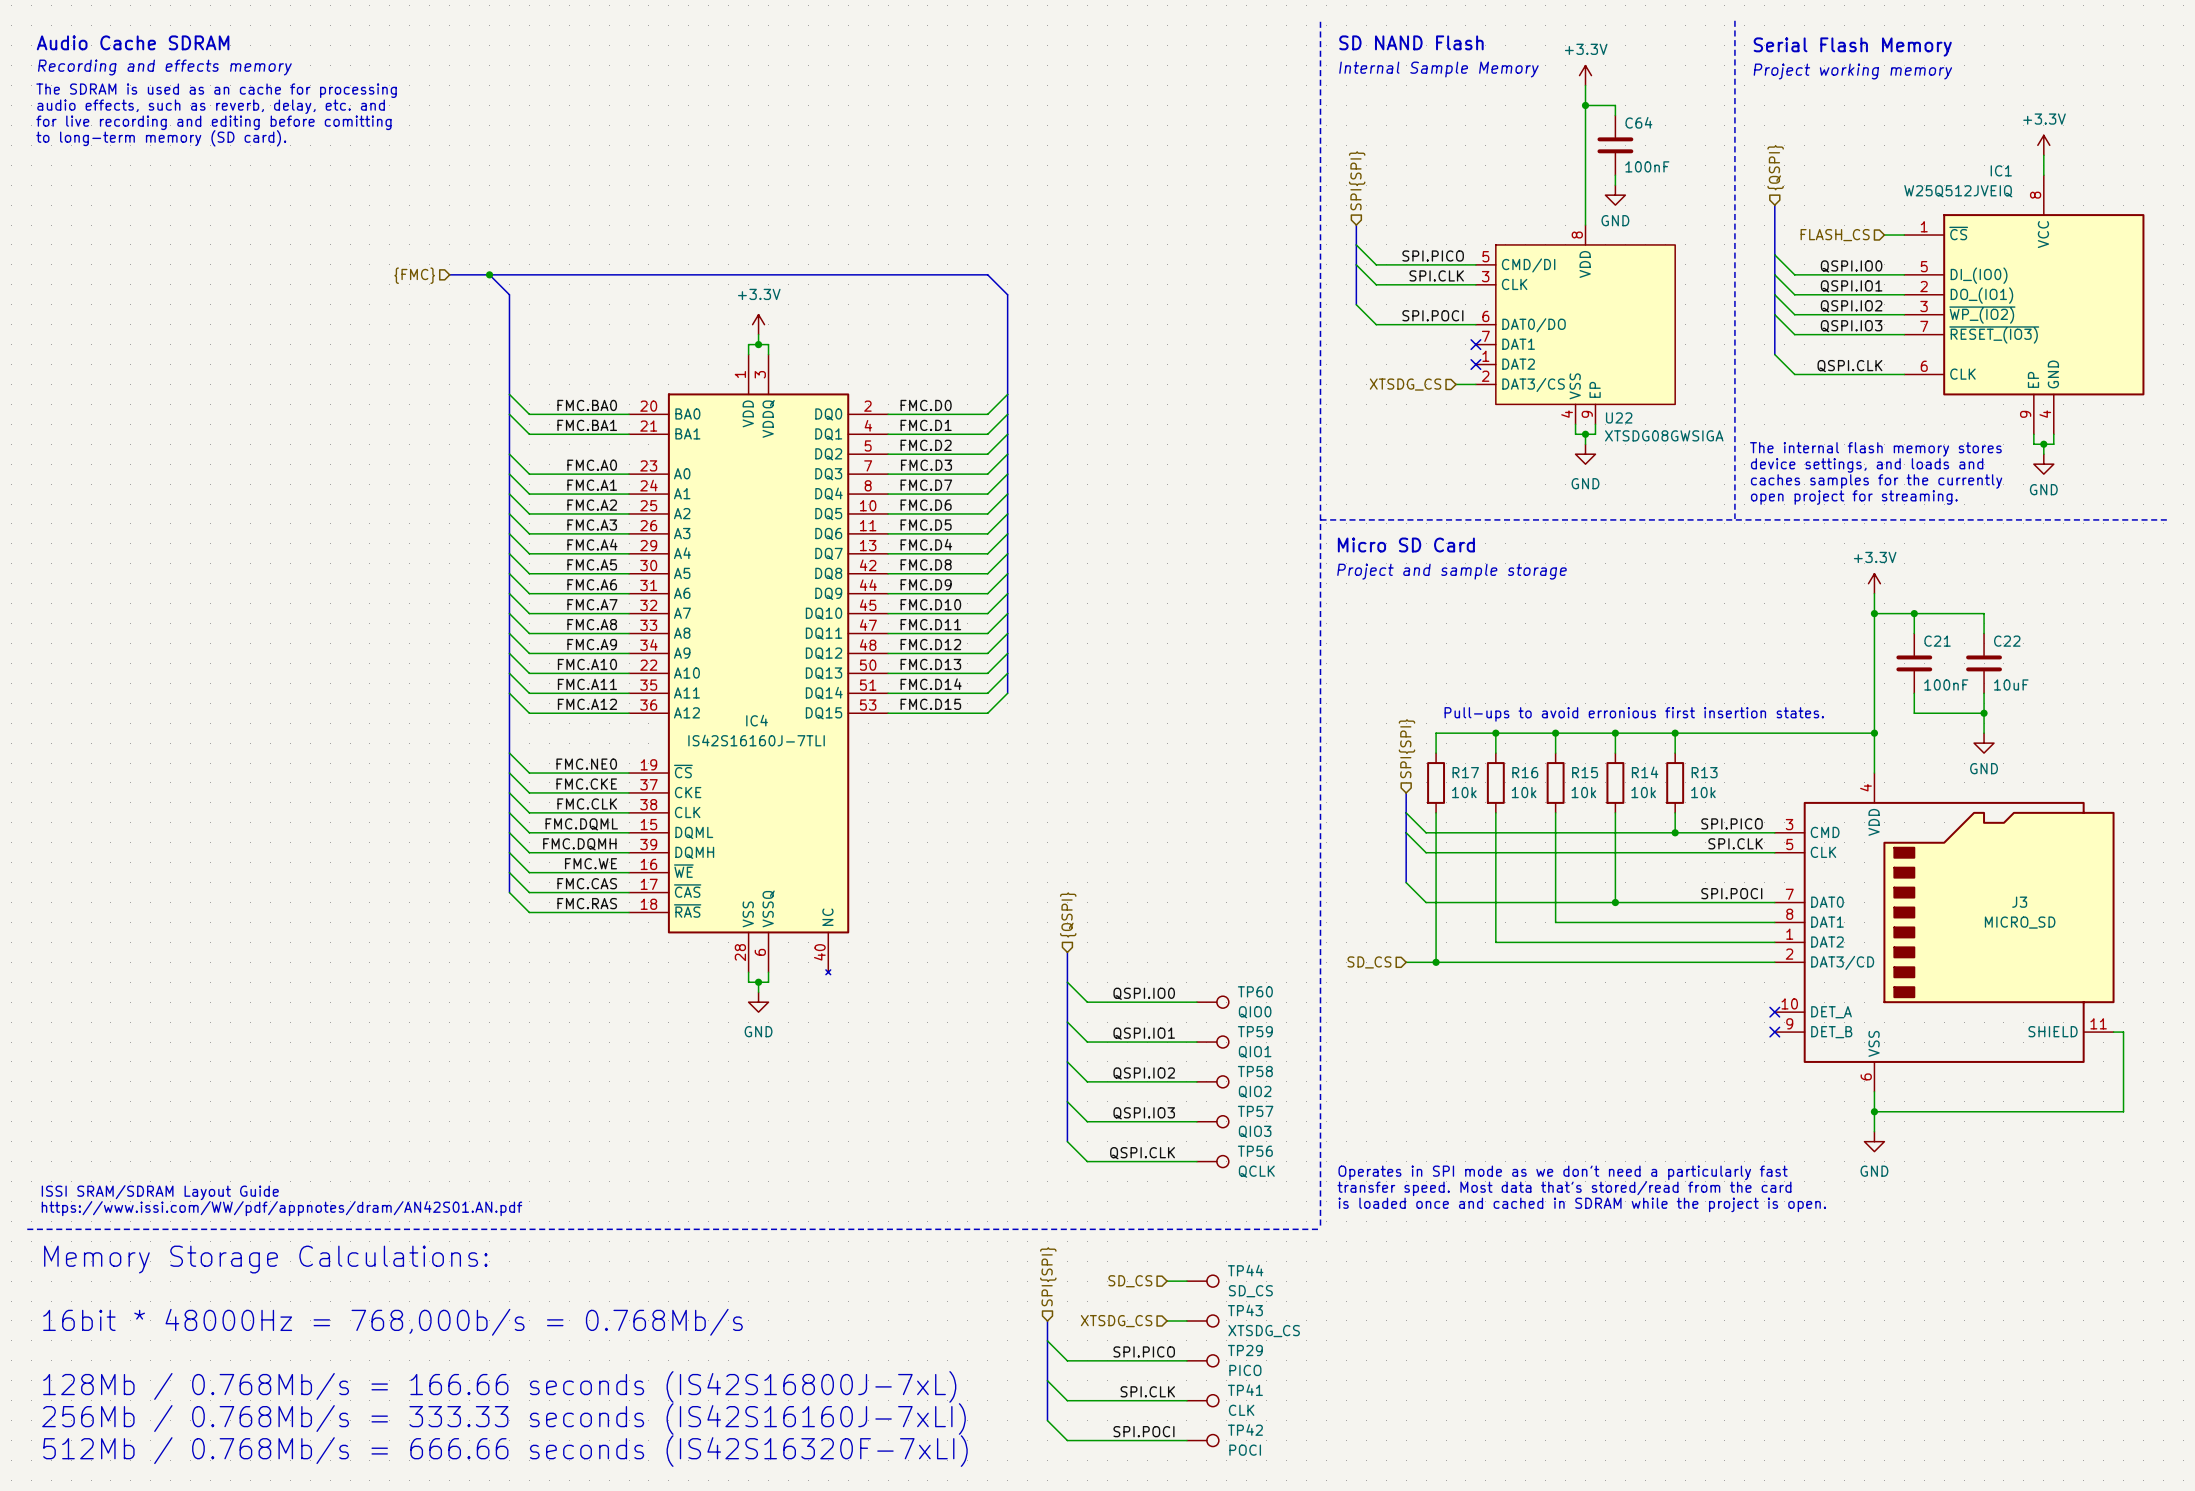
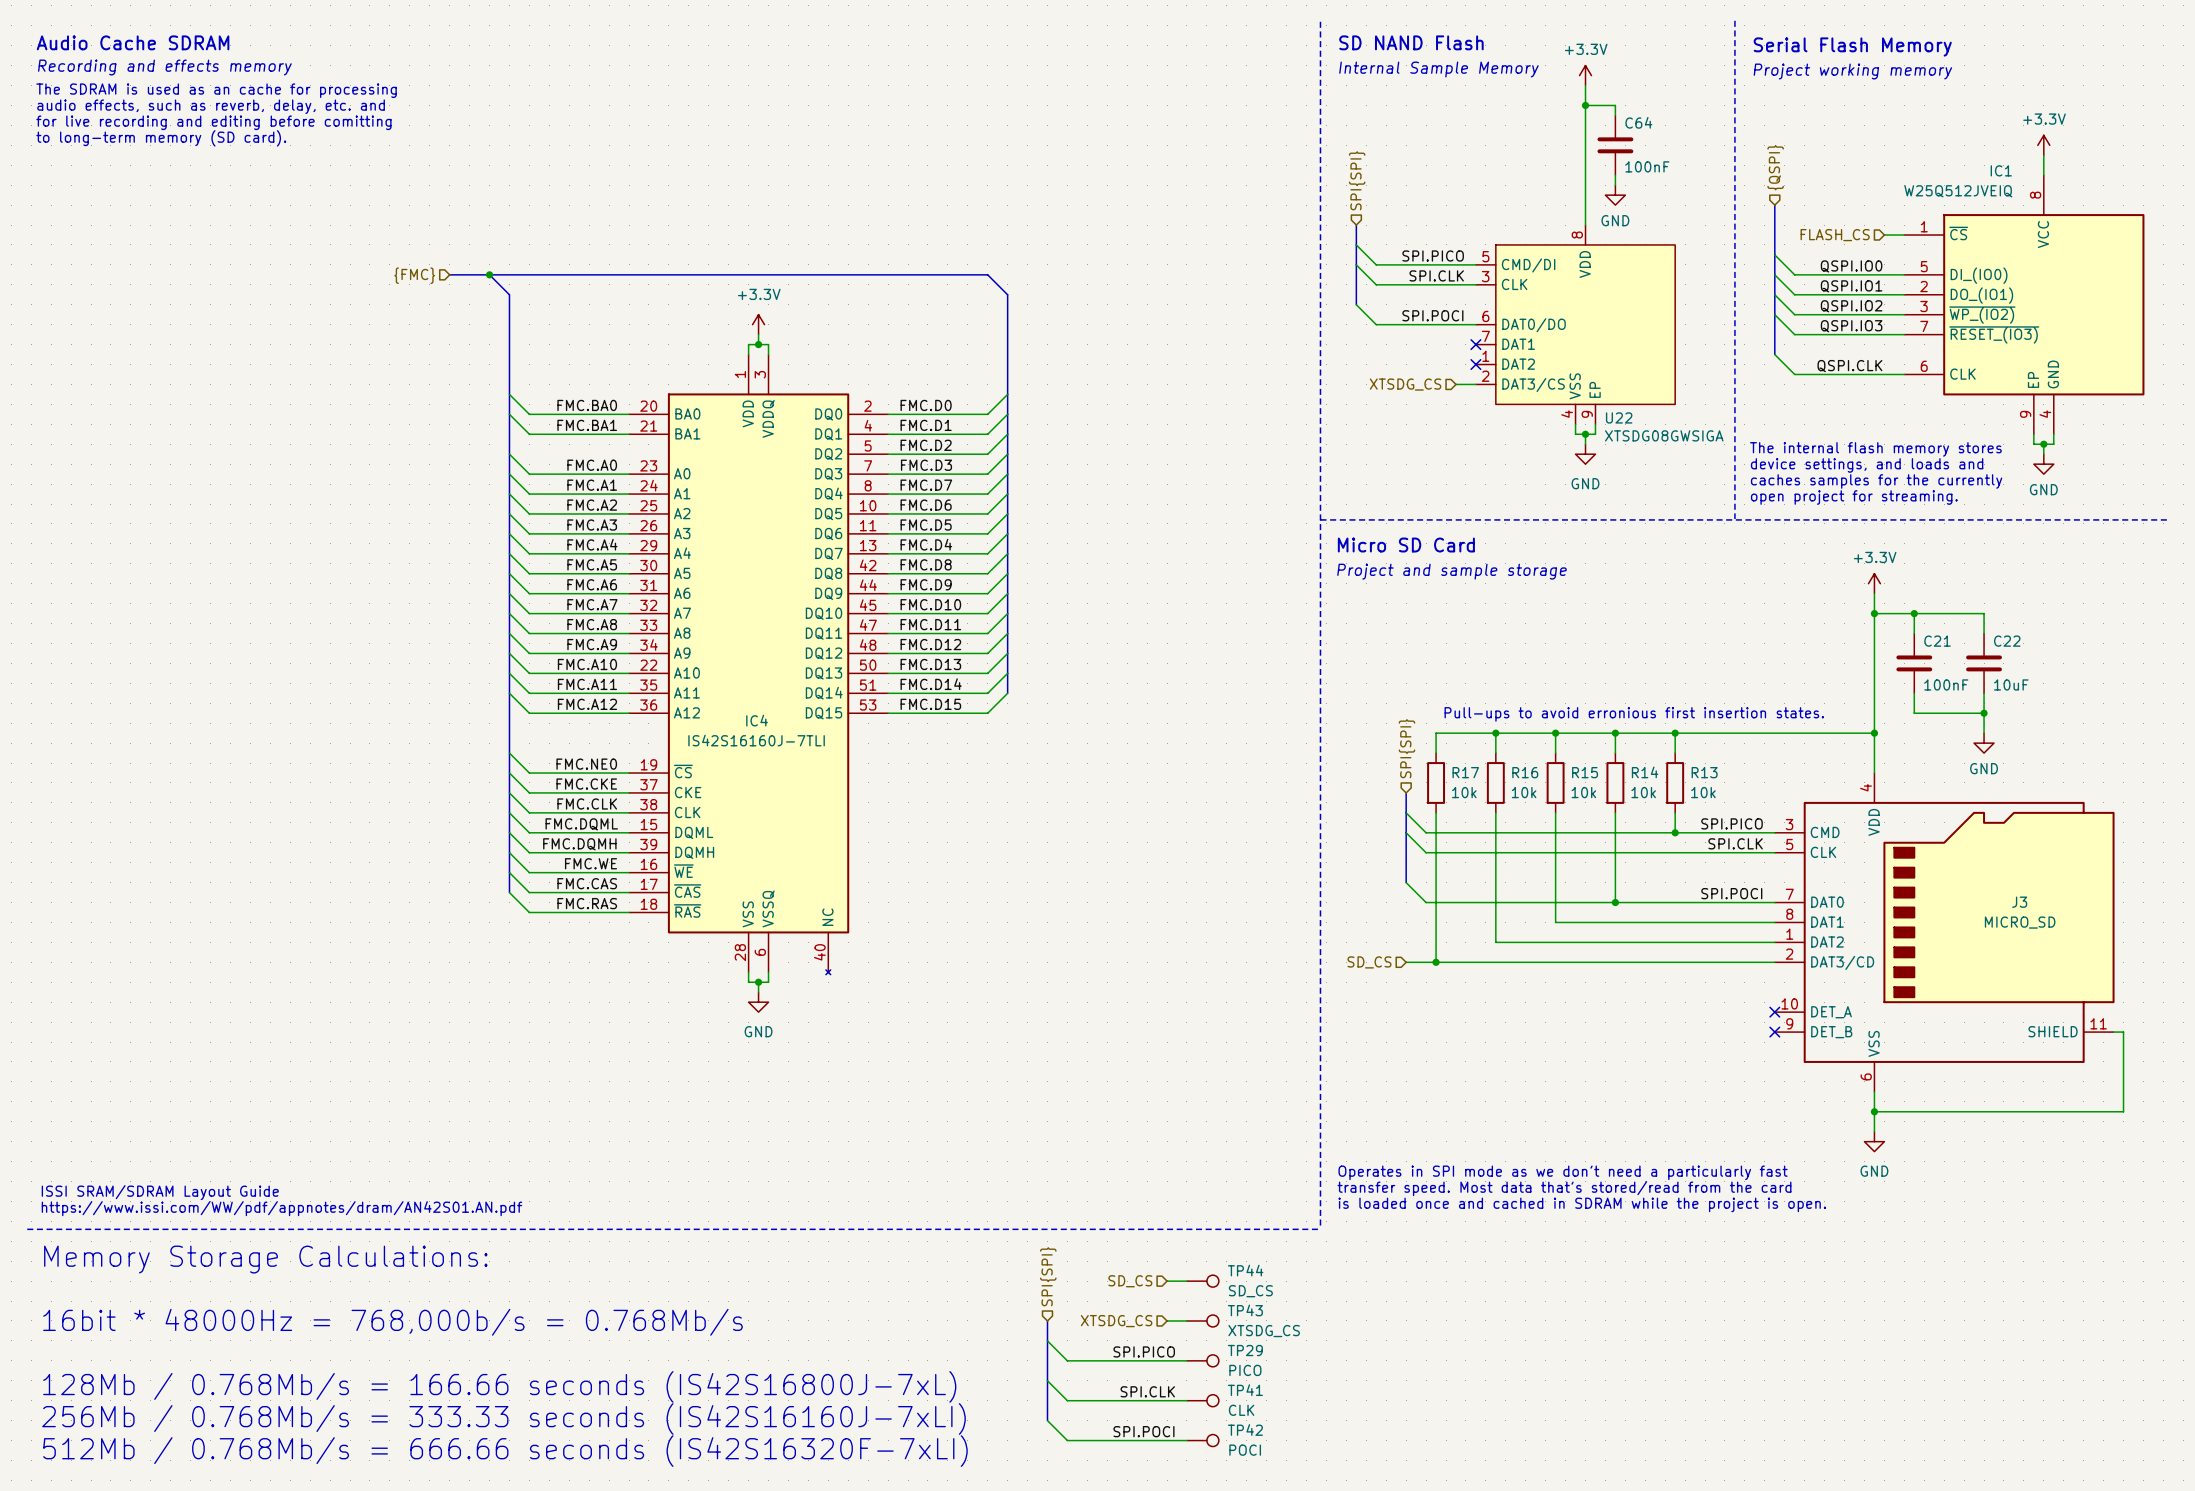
hierarchical label: {QSPI} (1068, 914) -> none
bus: (1067, 952) (1067, 1141) -> none
wire: (1067, 982) (1087, 1002) (1196, 1002) -> none
label: QSPI.IO0 (1144, 993) -> none
TP60: QIO0 (1212, 1002) -> none
wire: (1067, 1022) (1087, 1042) (1196, 1042) -> none
label: QSPI.IO1 (1144, 1033) -> none
TP59: QIO1 (1212, 1042) -> none
wire: (1067, 1061) (1087, 1081) (1196, 1081) -> none
label: QSPI.IO2 (1144, 1073) -> none
TP58: QIO2 (1212, 1081) -> none
wire: (1067, 1101) (1087, 1121) (1196, 1121) -> none
label: QSPI.IO3 (1144, 1113) -> none
TP57: QIO3 (1212, 1121) -> none
wire: (1067, 1141) (1087, 1161) (1196, 1161) -> none
label: QSPI.CLK (1142, 1153) -> none
TP56: QCLK (1212, 1161) -> none

